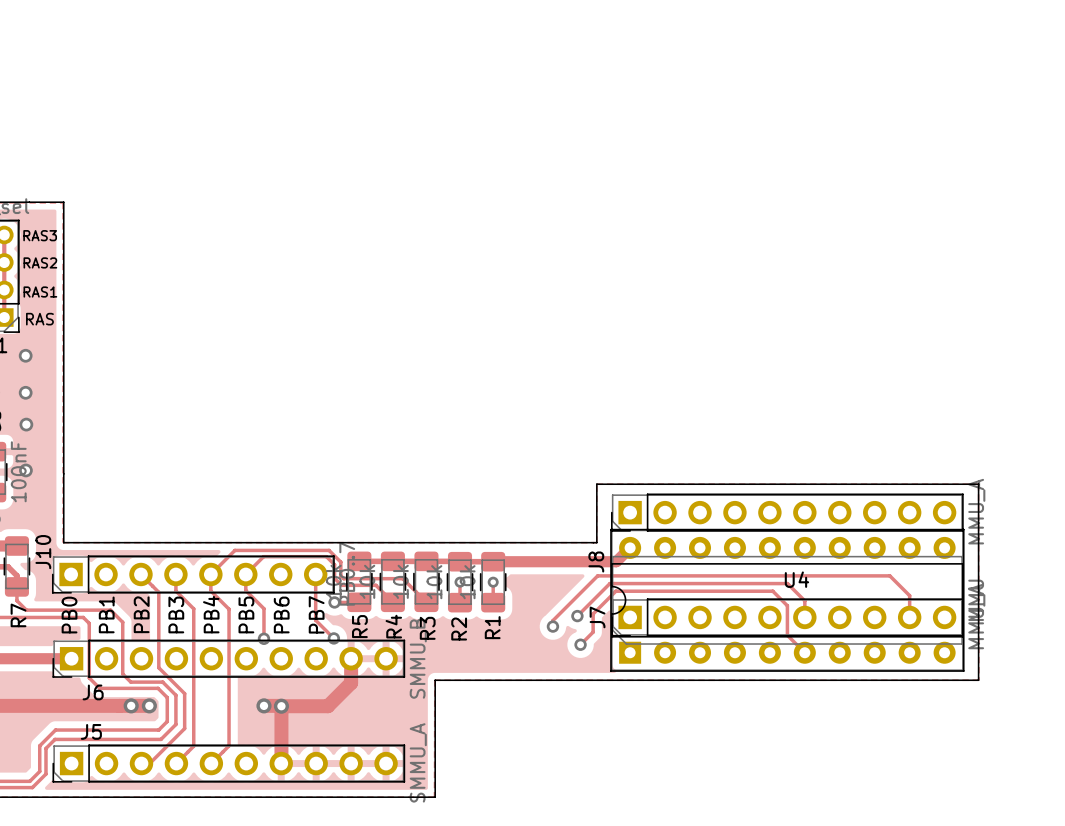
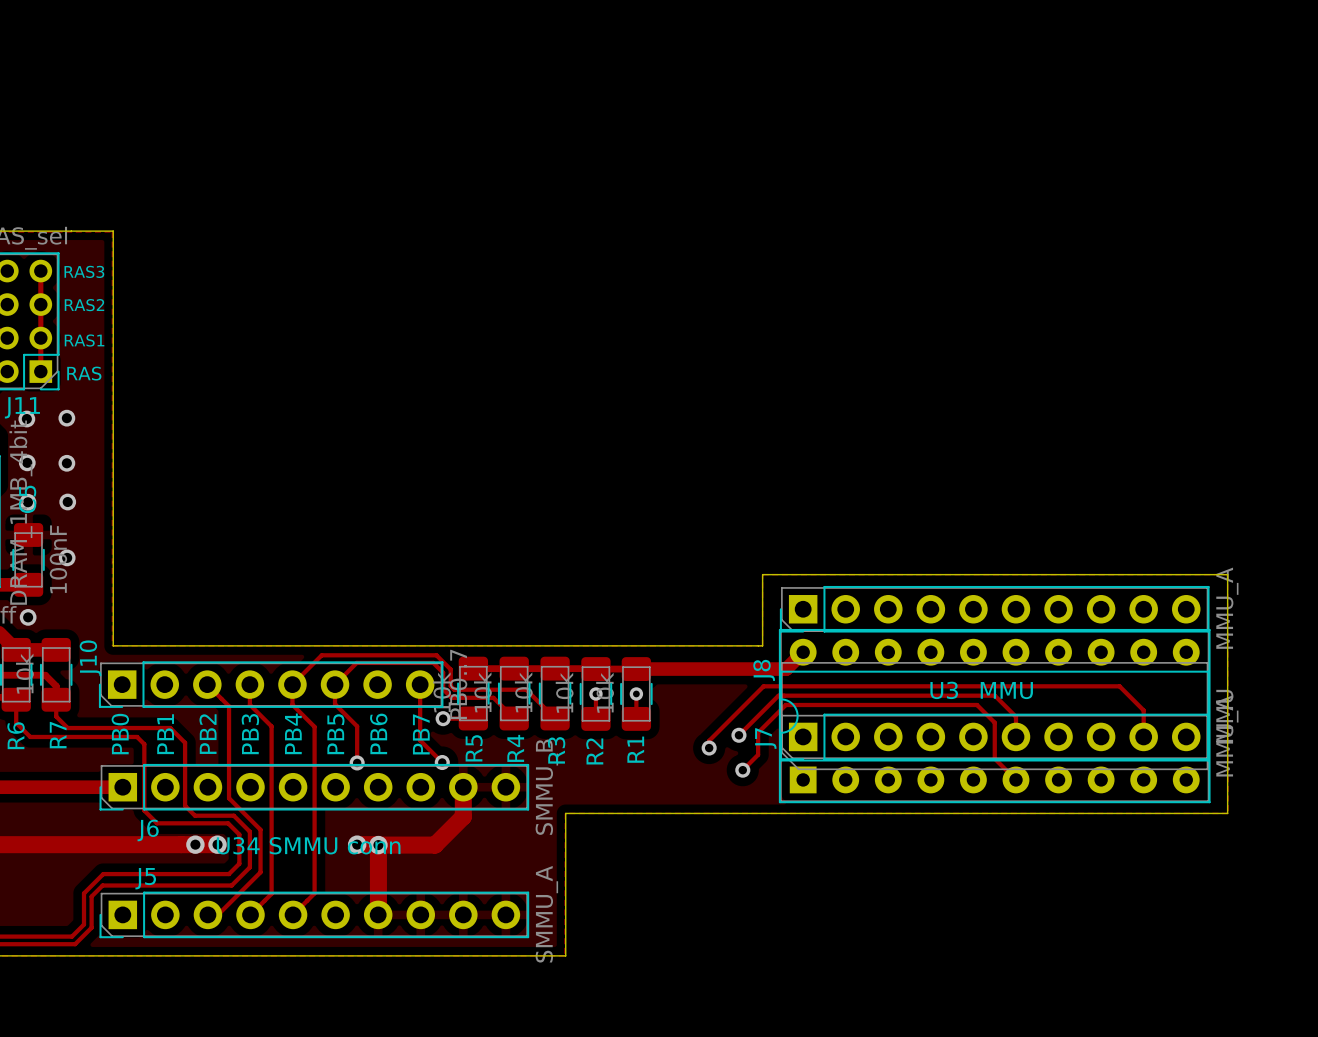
U4 name: U4 (796, 579) -> U3 (944, 690)
text: none -> MMU (1006, 690)
text: none -> U34 SMMU conn (308, 845)

